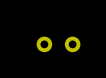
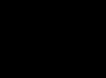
part: (58, 44) -> none

